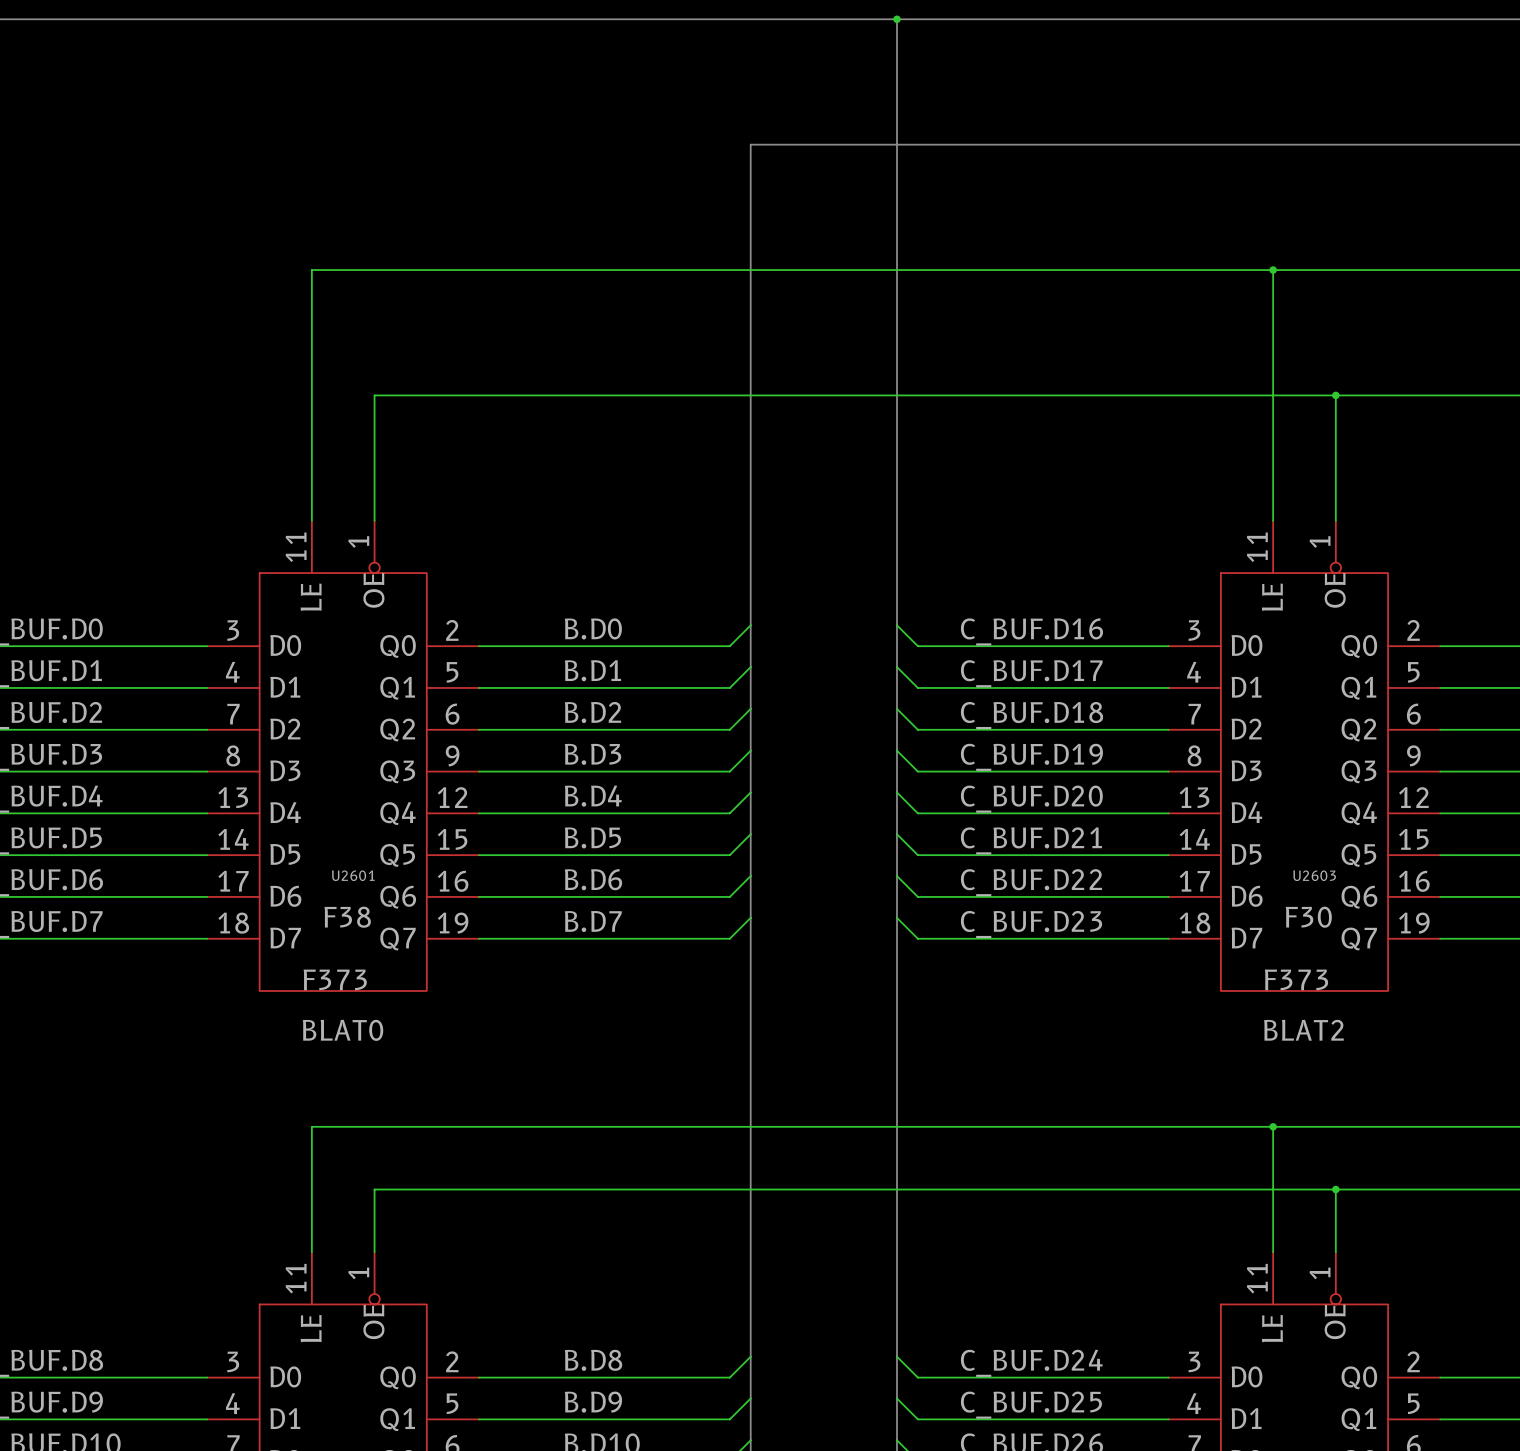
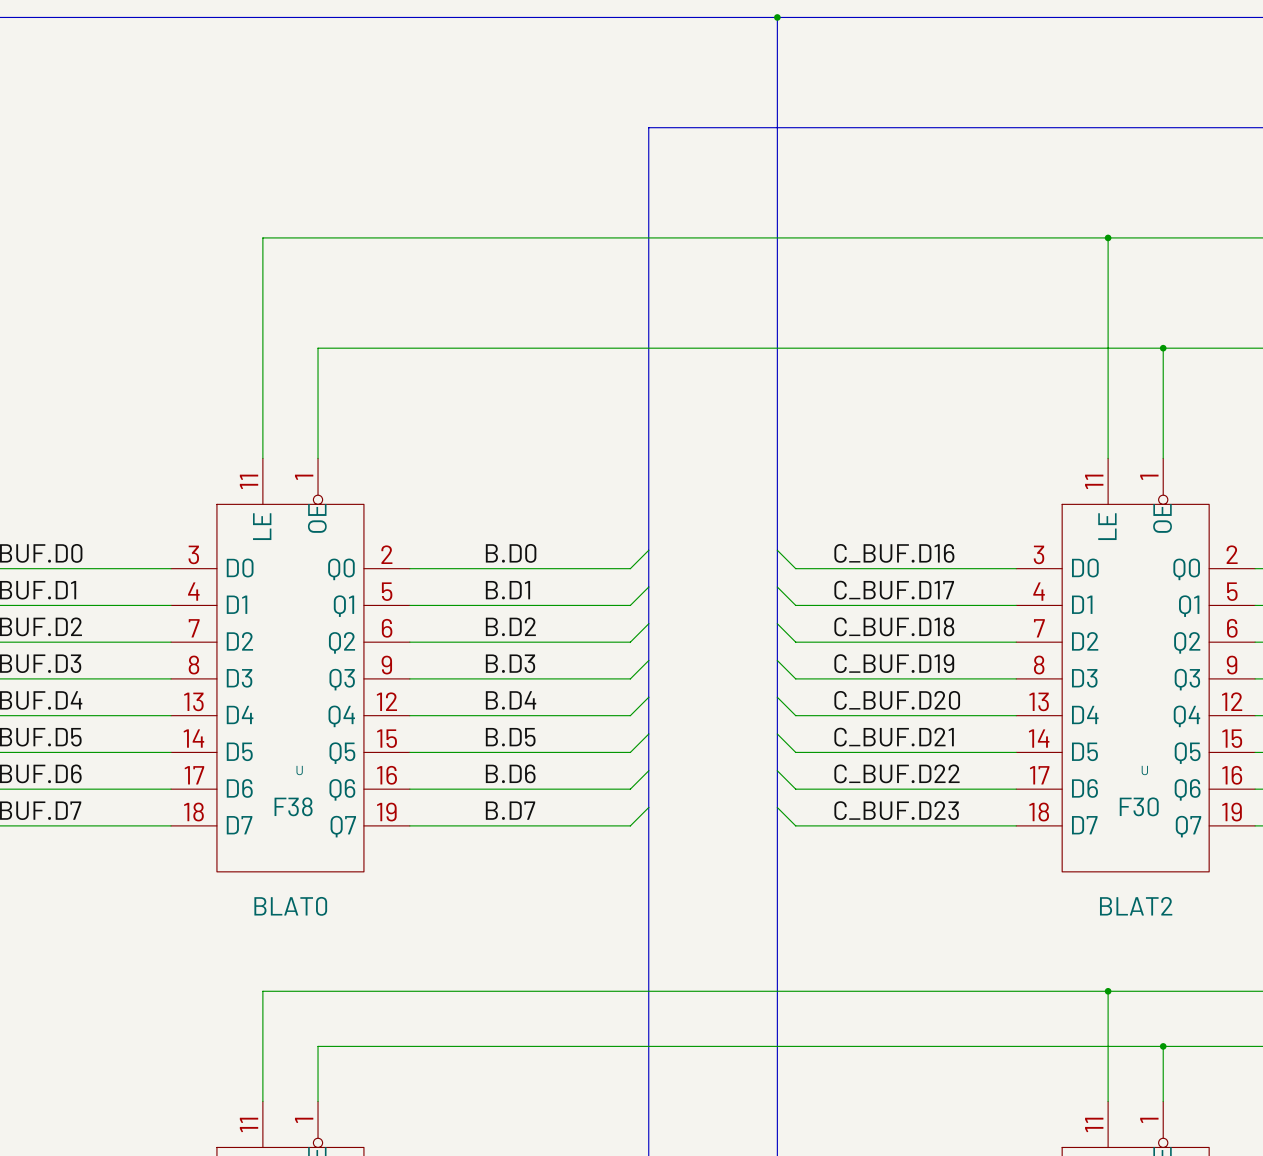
U2601 name: U2601 (353, 875) -> U (299, 770)
U2603 name: U2603 (1314, 875) -> U (1144, 770)
U2601 value: F373 (335, 979) -> none
U2603 value: F373 (1296, 979) -> none

